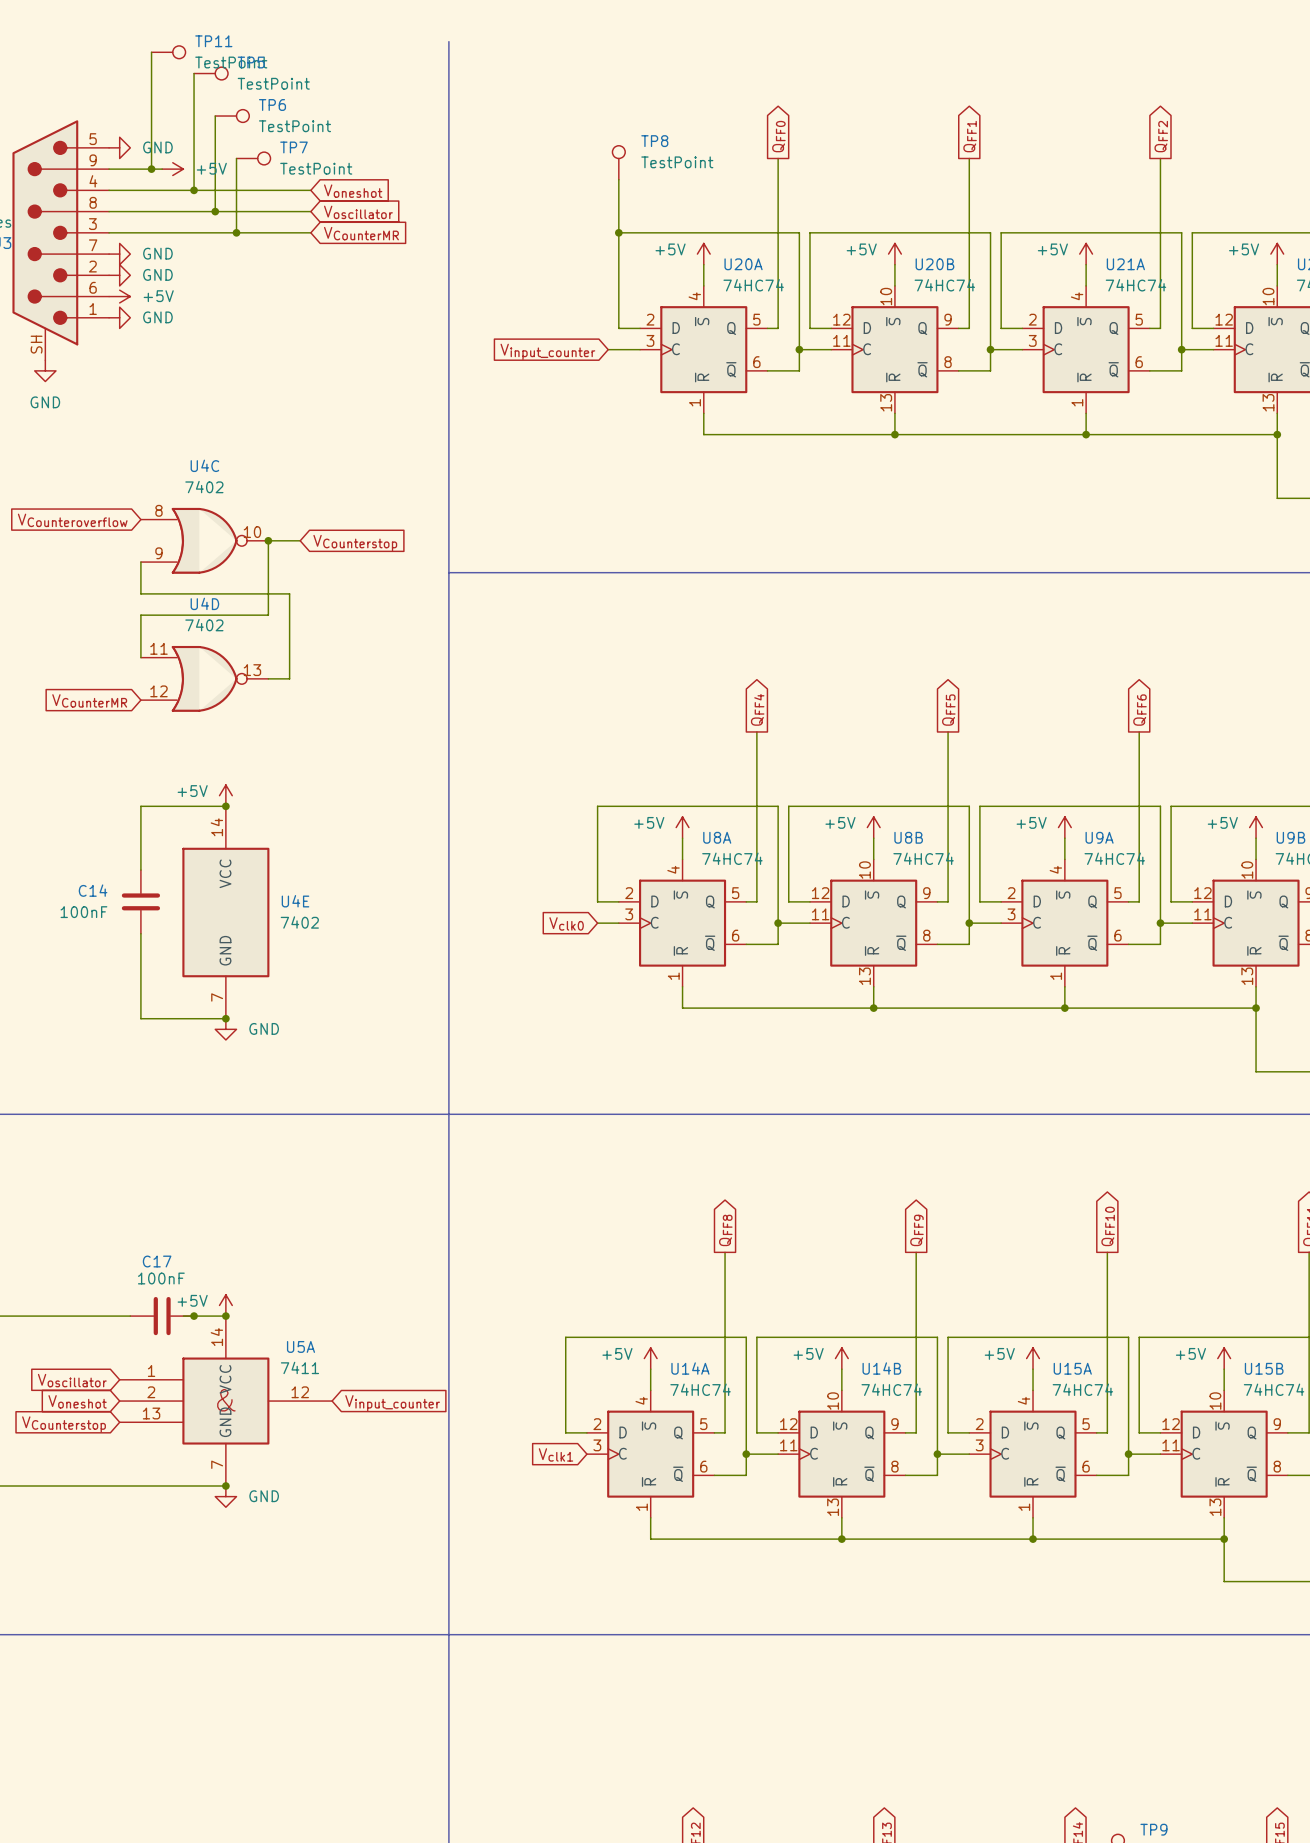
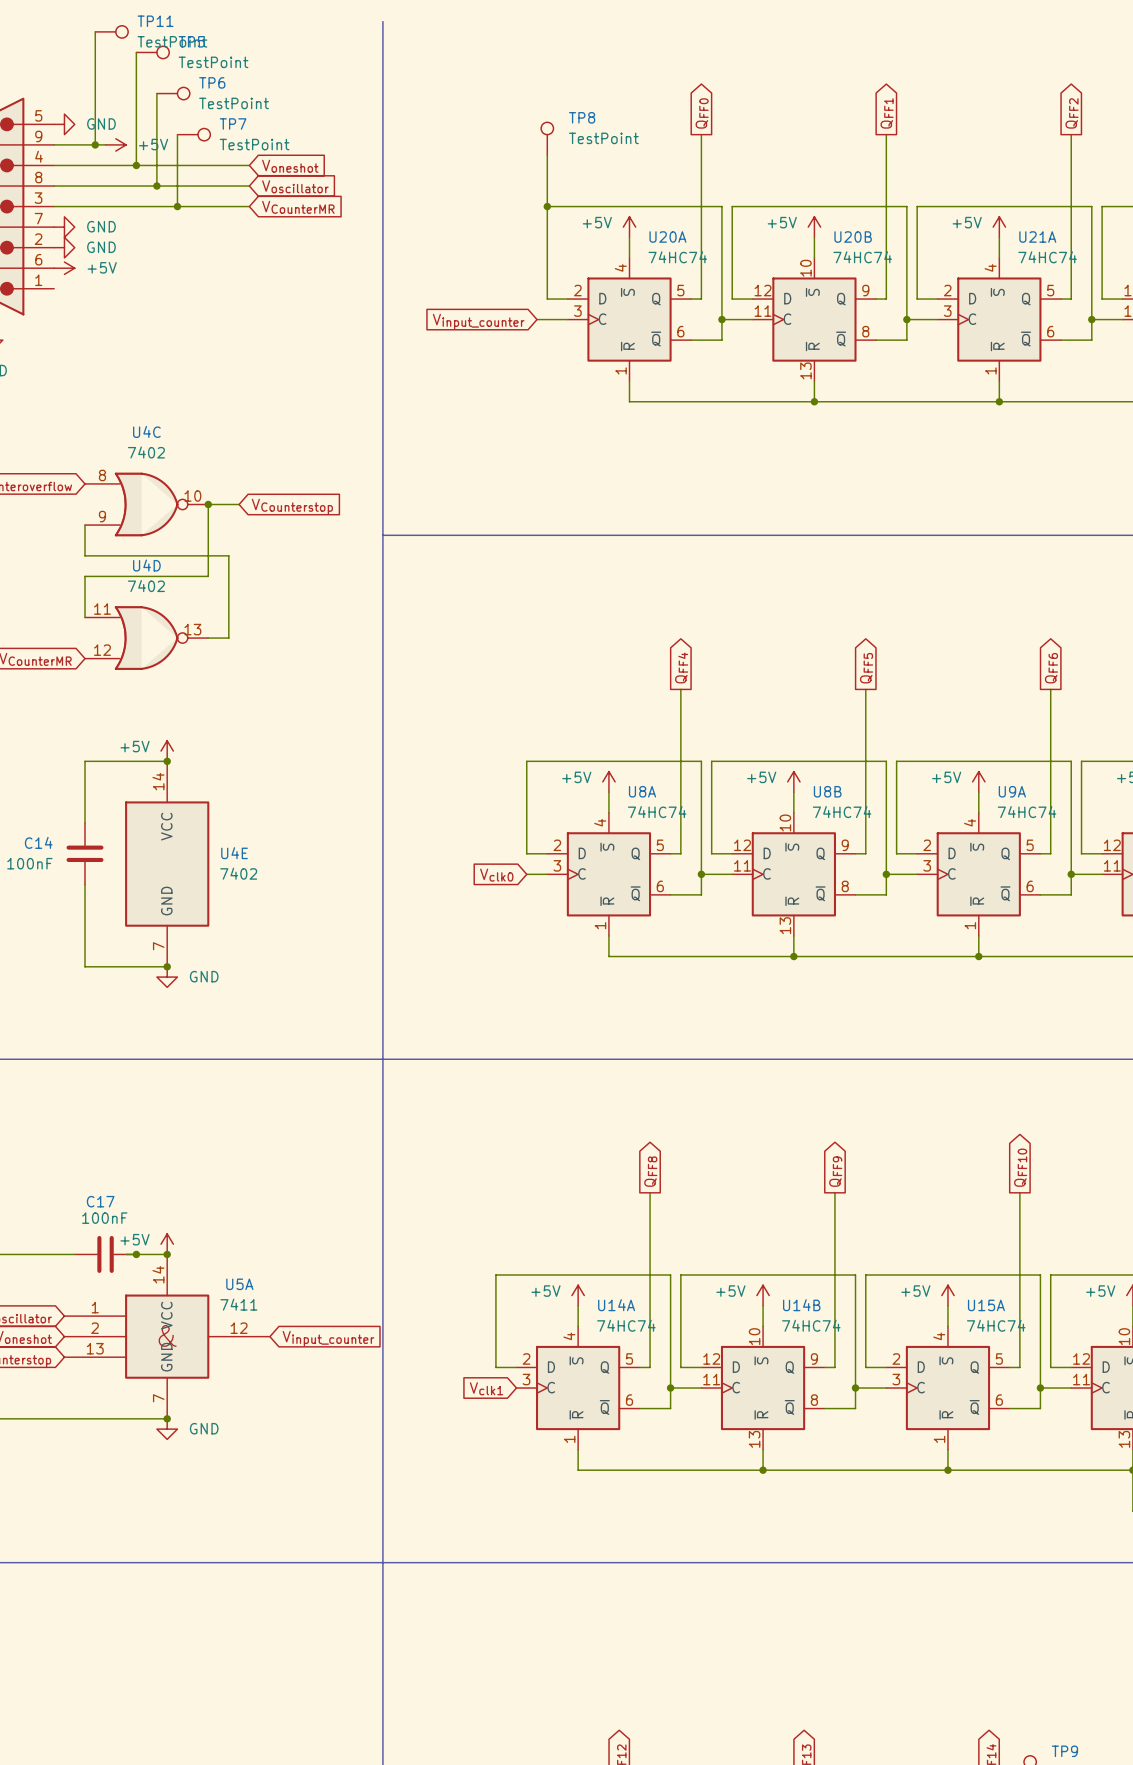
power symbol: GND (119, 317) -> none

